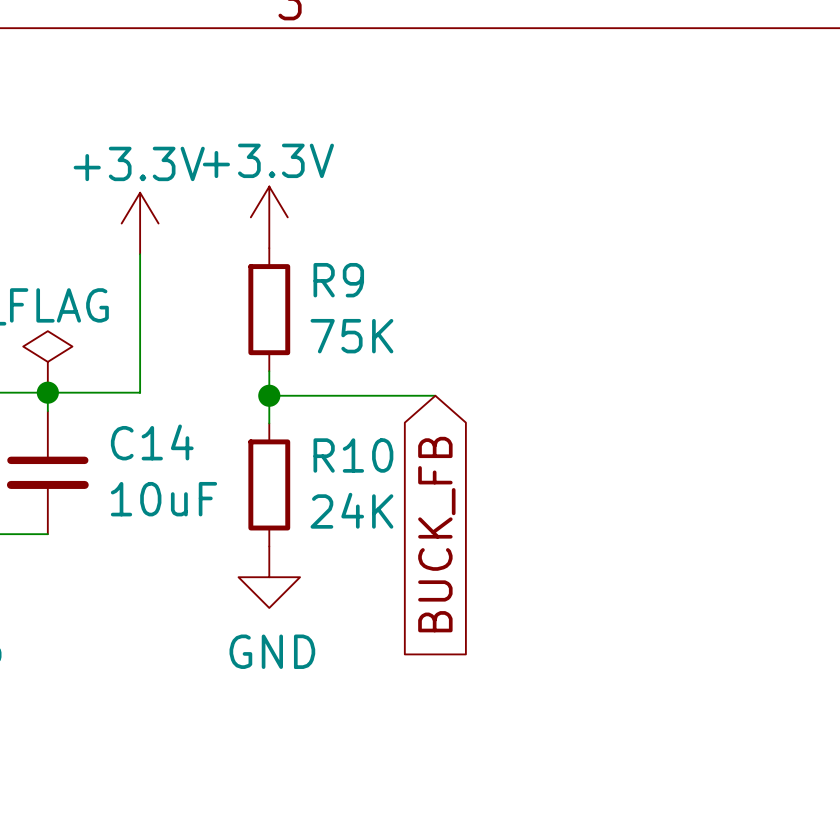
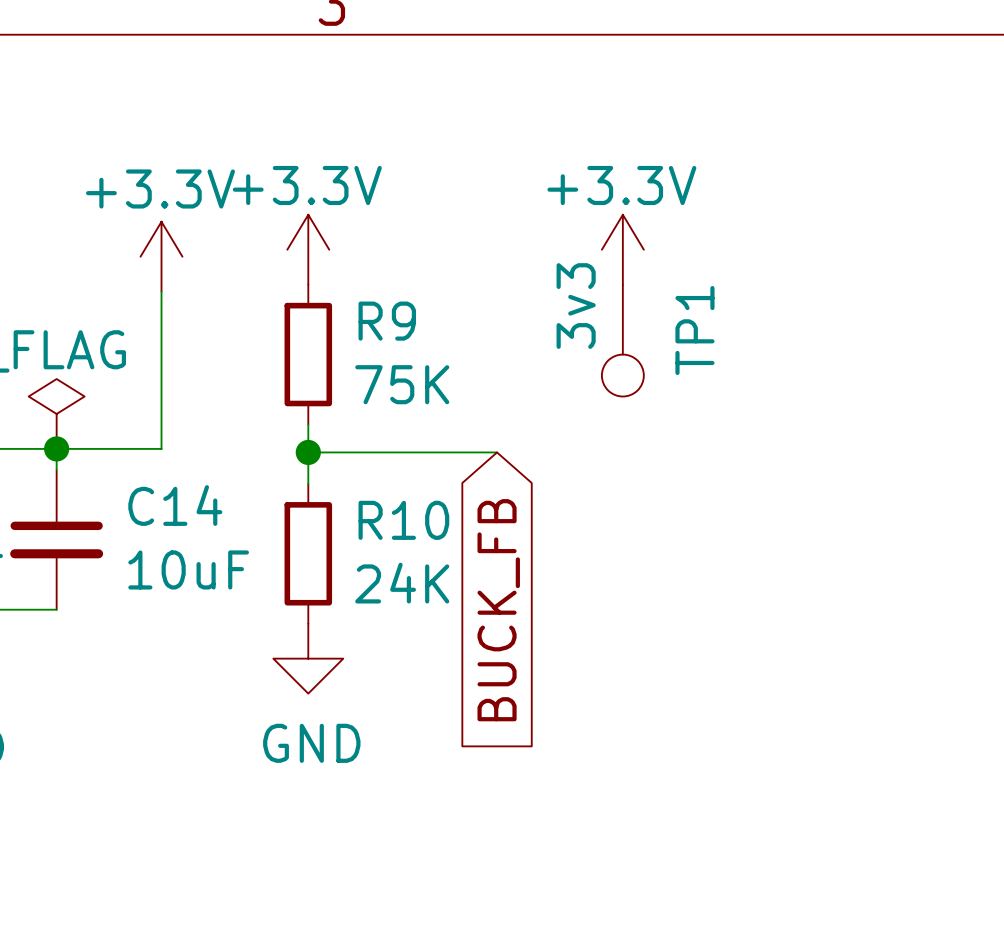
power symbol: none -> +3.3V (622, 249)
TP1: none -> 3v3 (622, 340)

